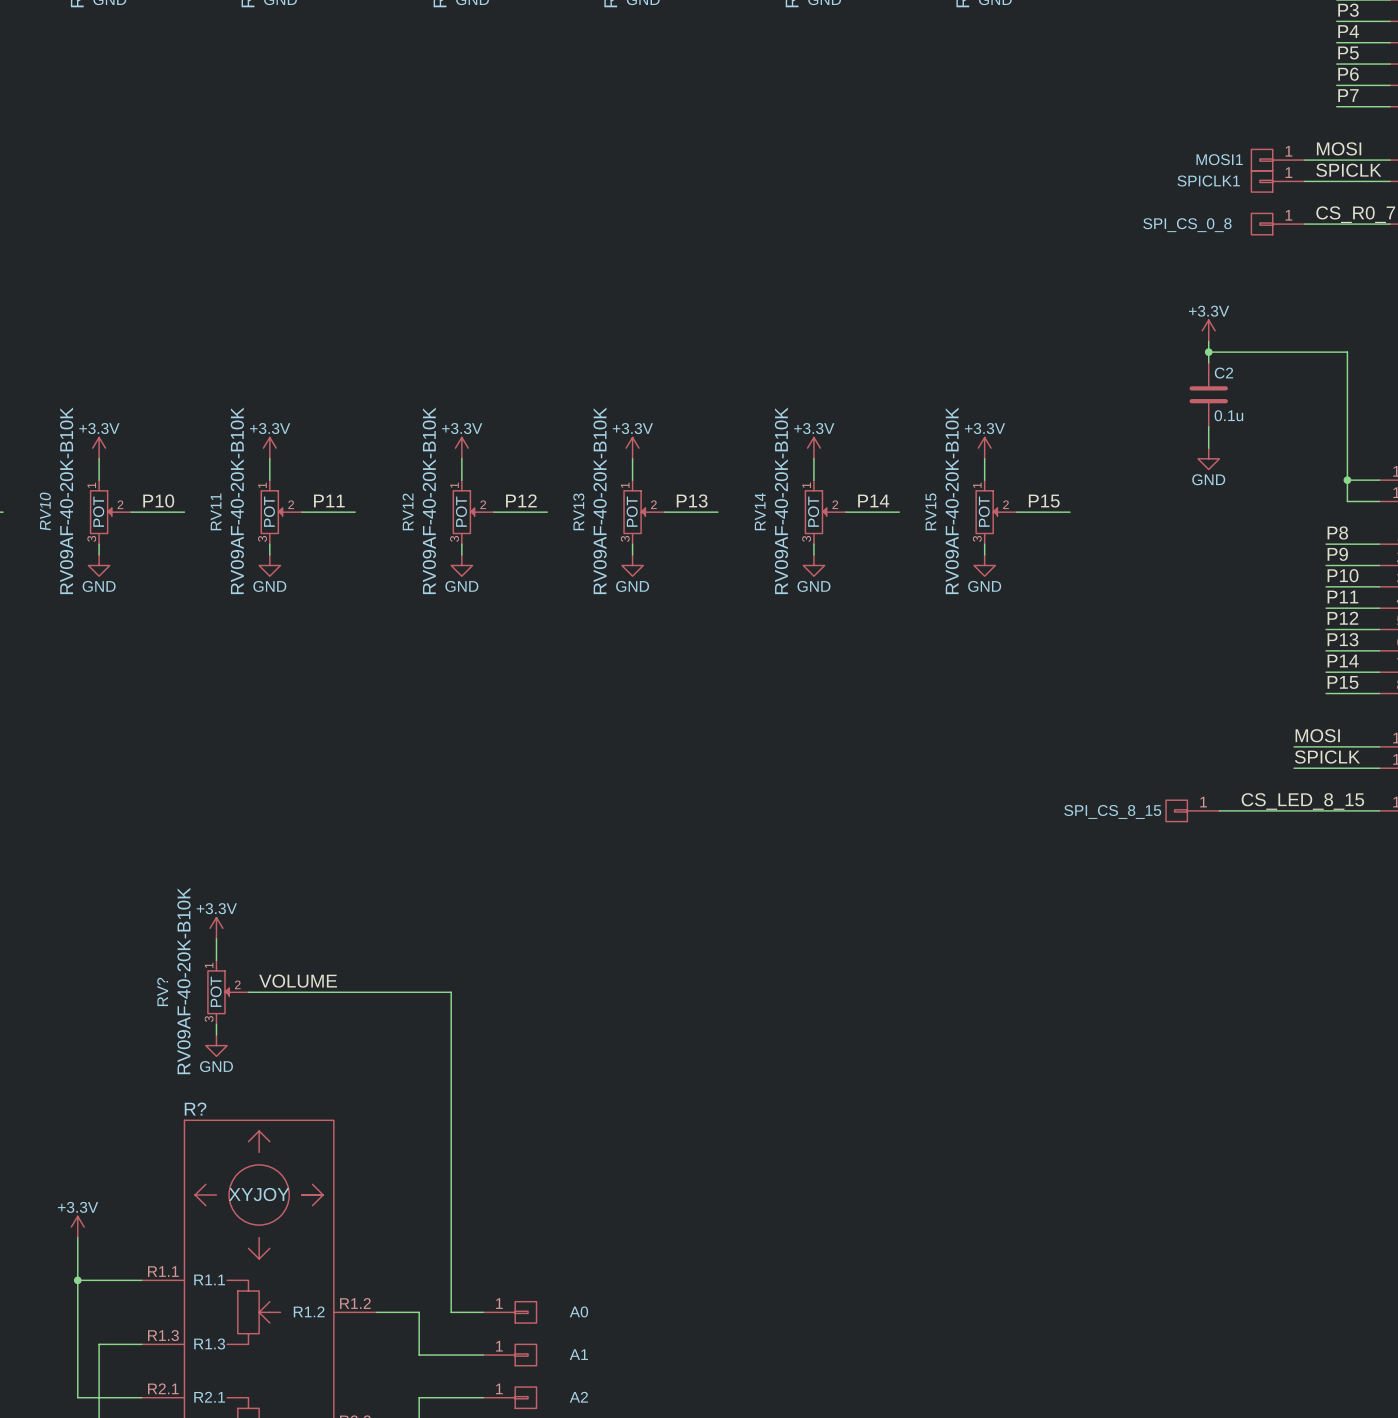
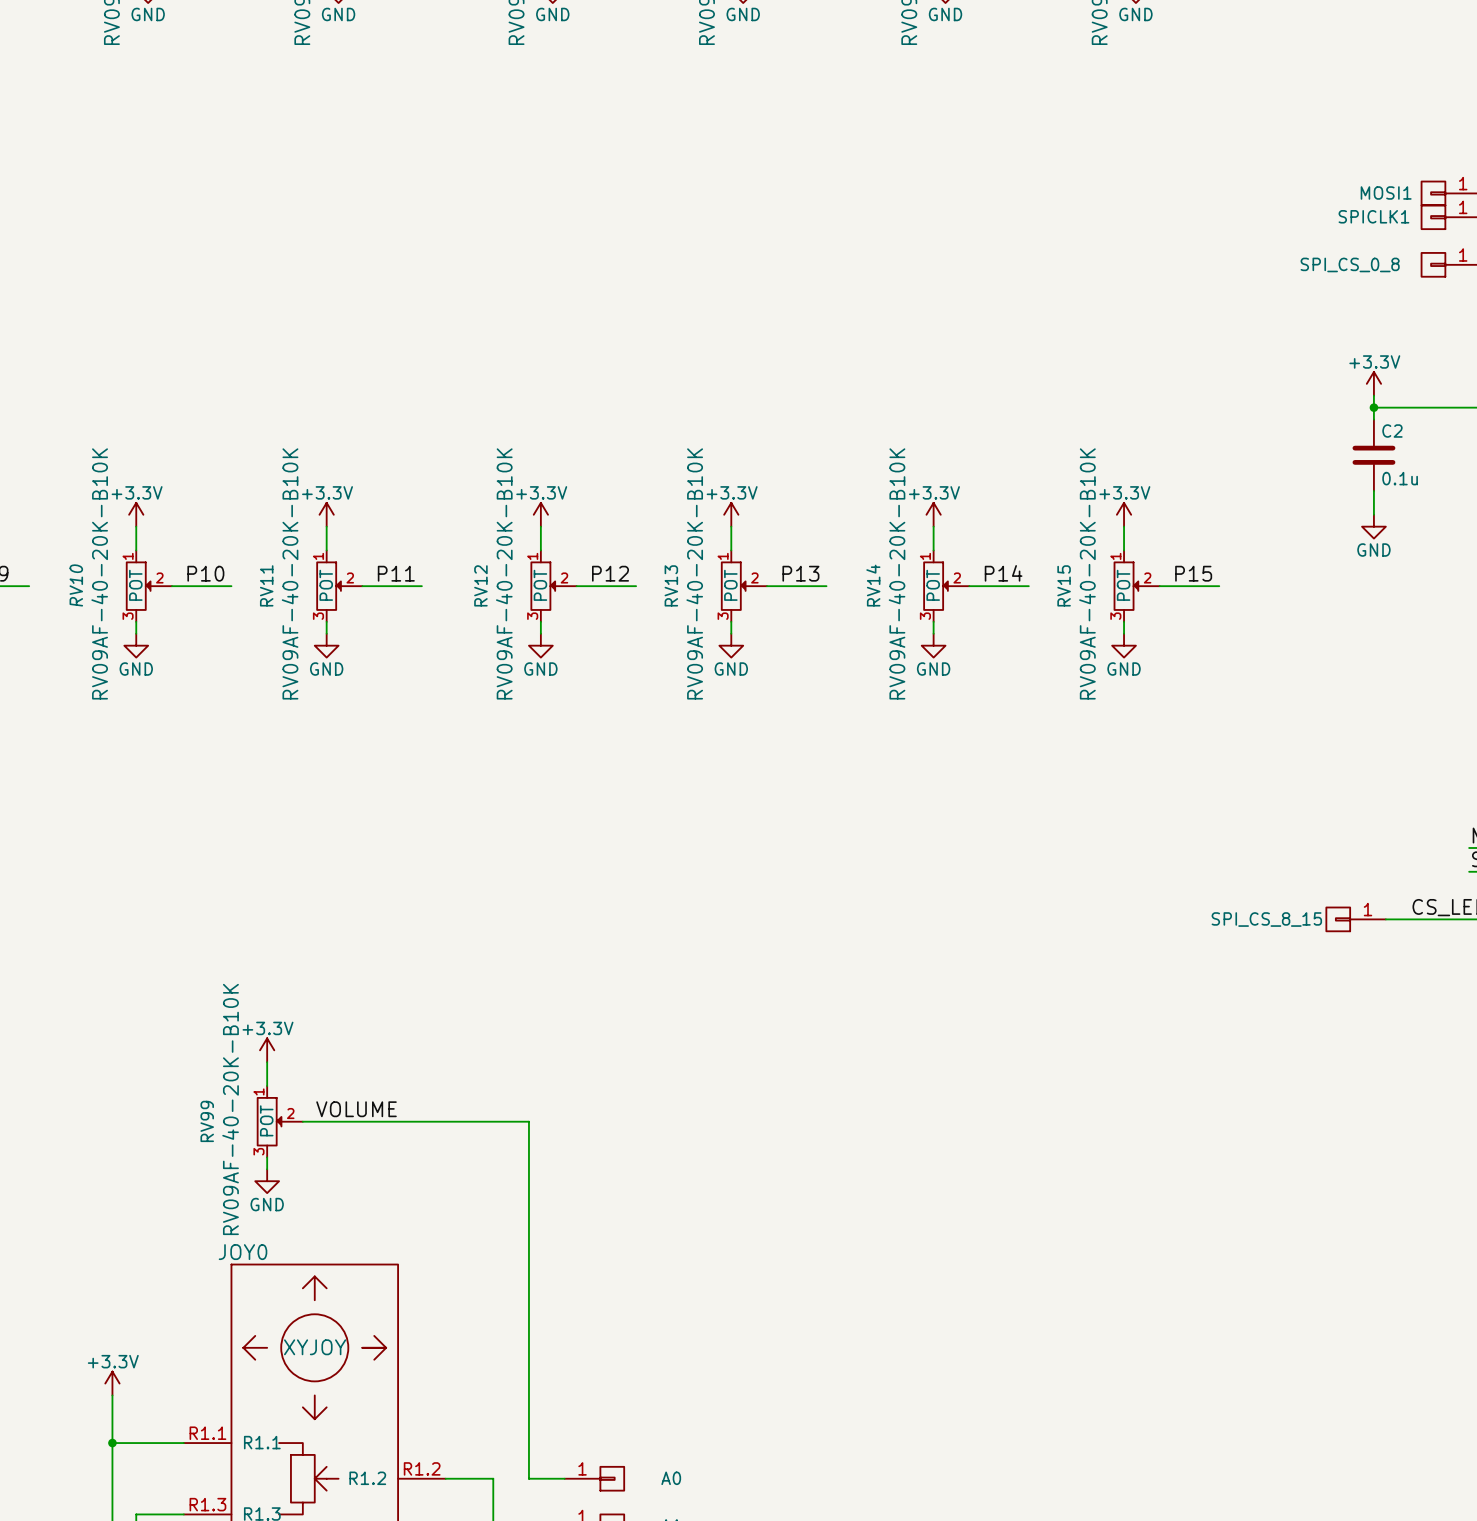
RV? name: RV? (162, 991) -> RV99 (207, 1121)
R? name: R? (195, 1109) -> JOY0 (243, 1252)

